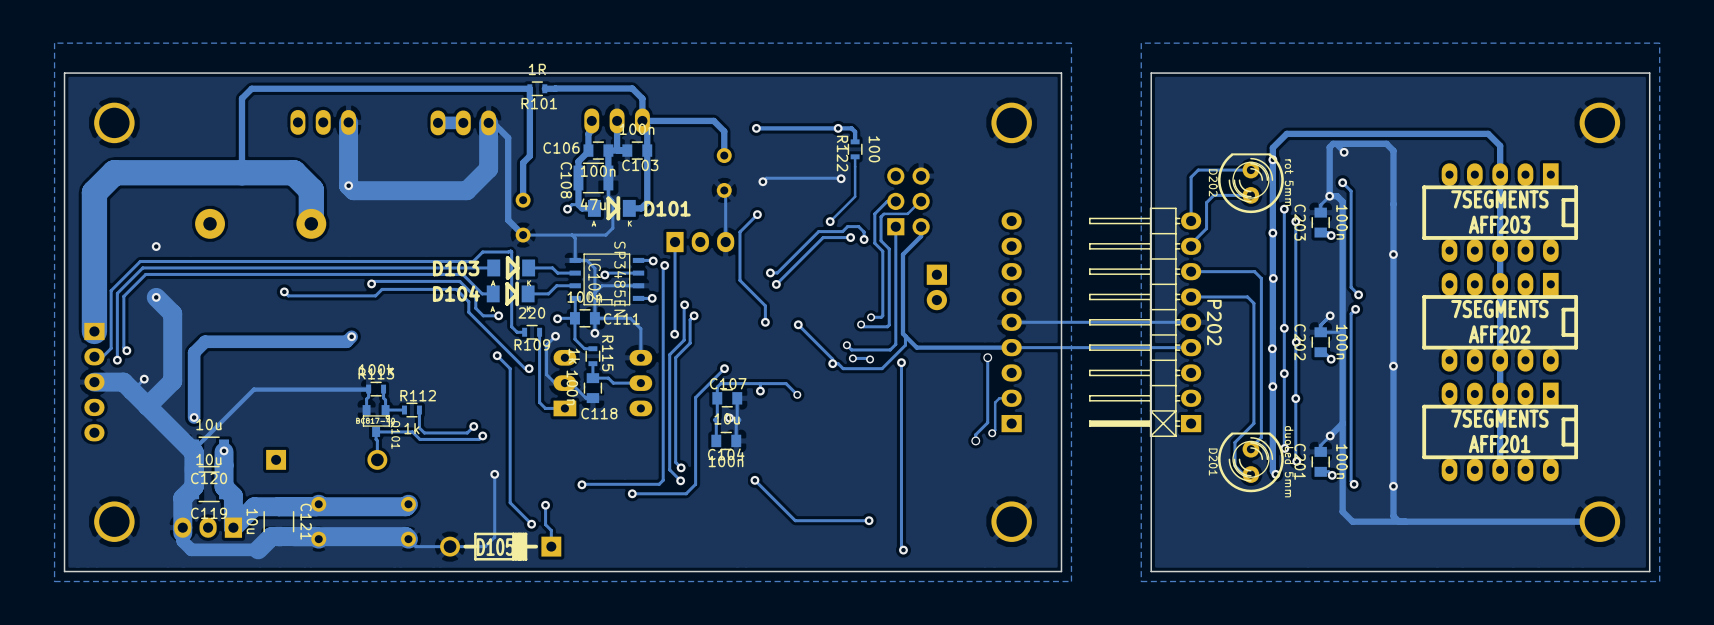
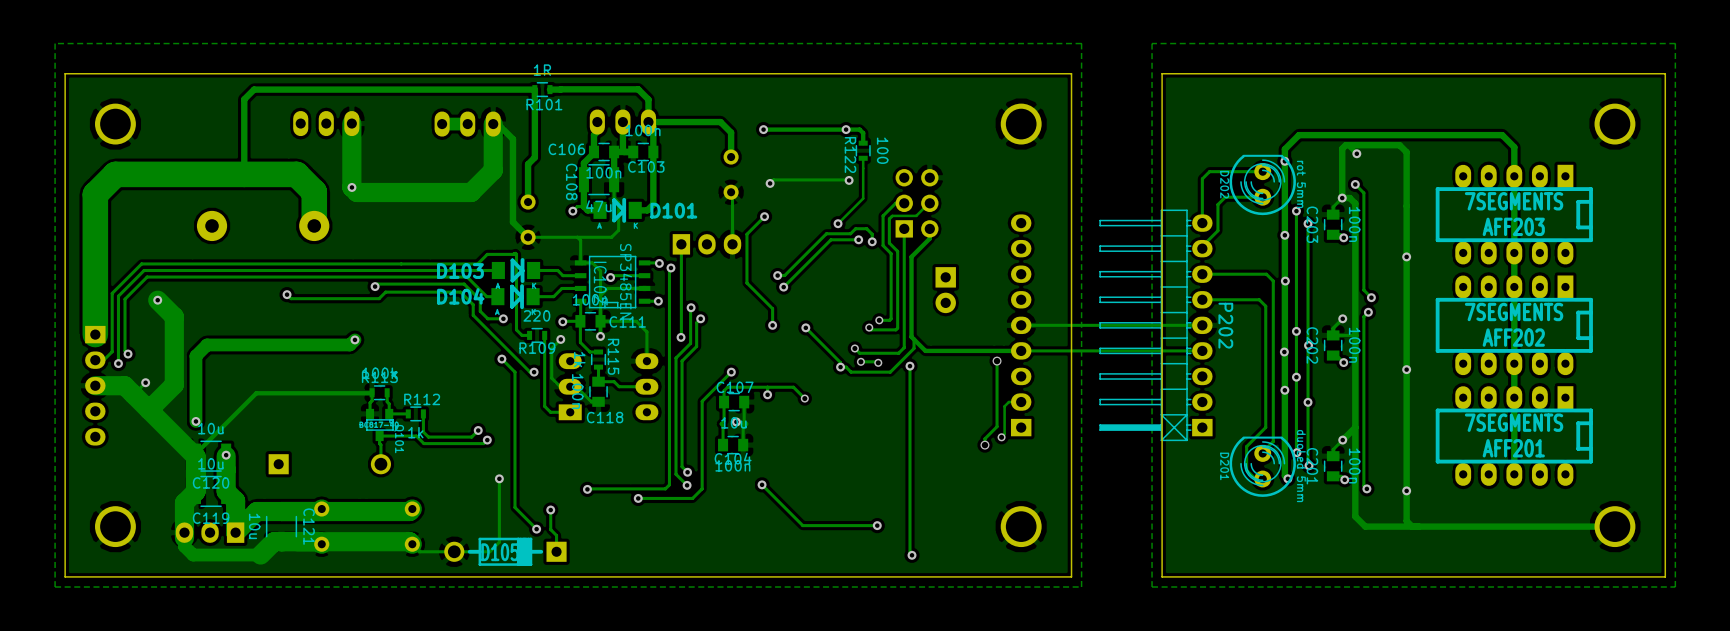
via: (156, 246) -> none

